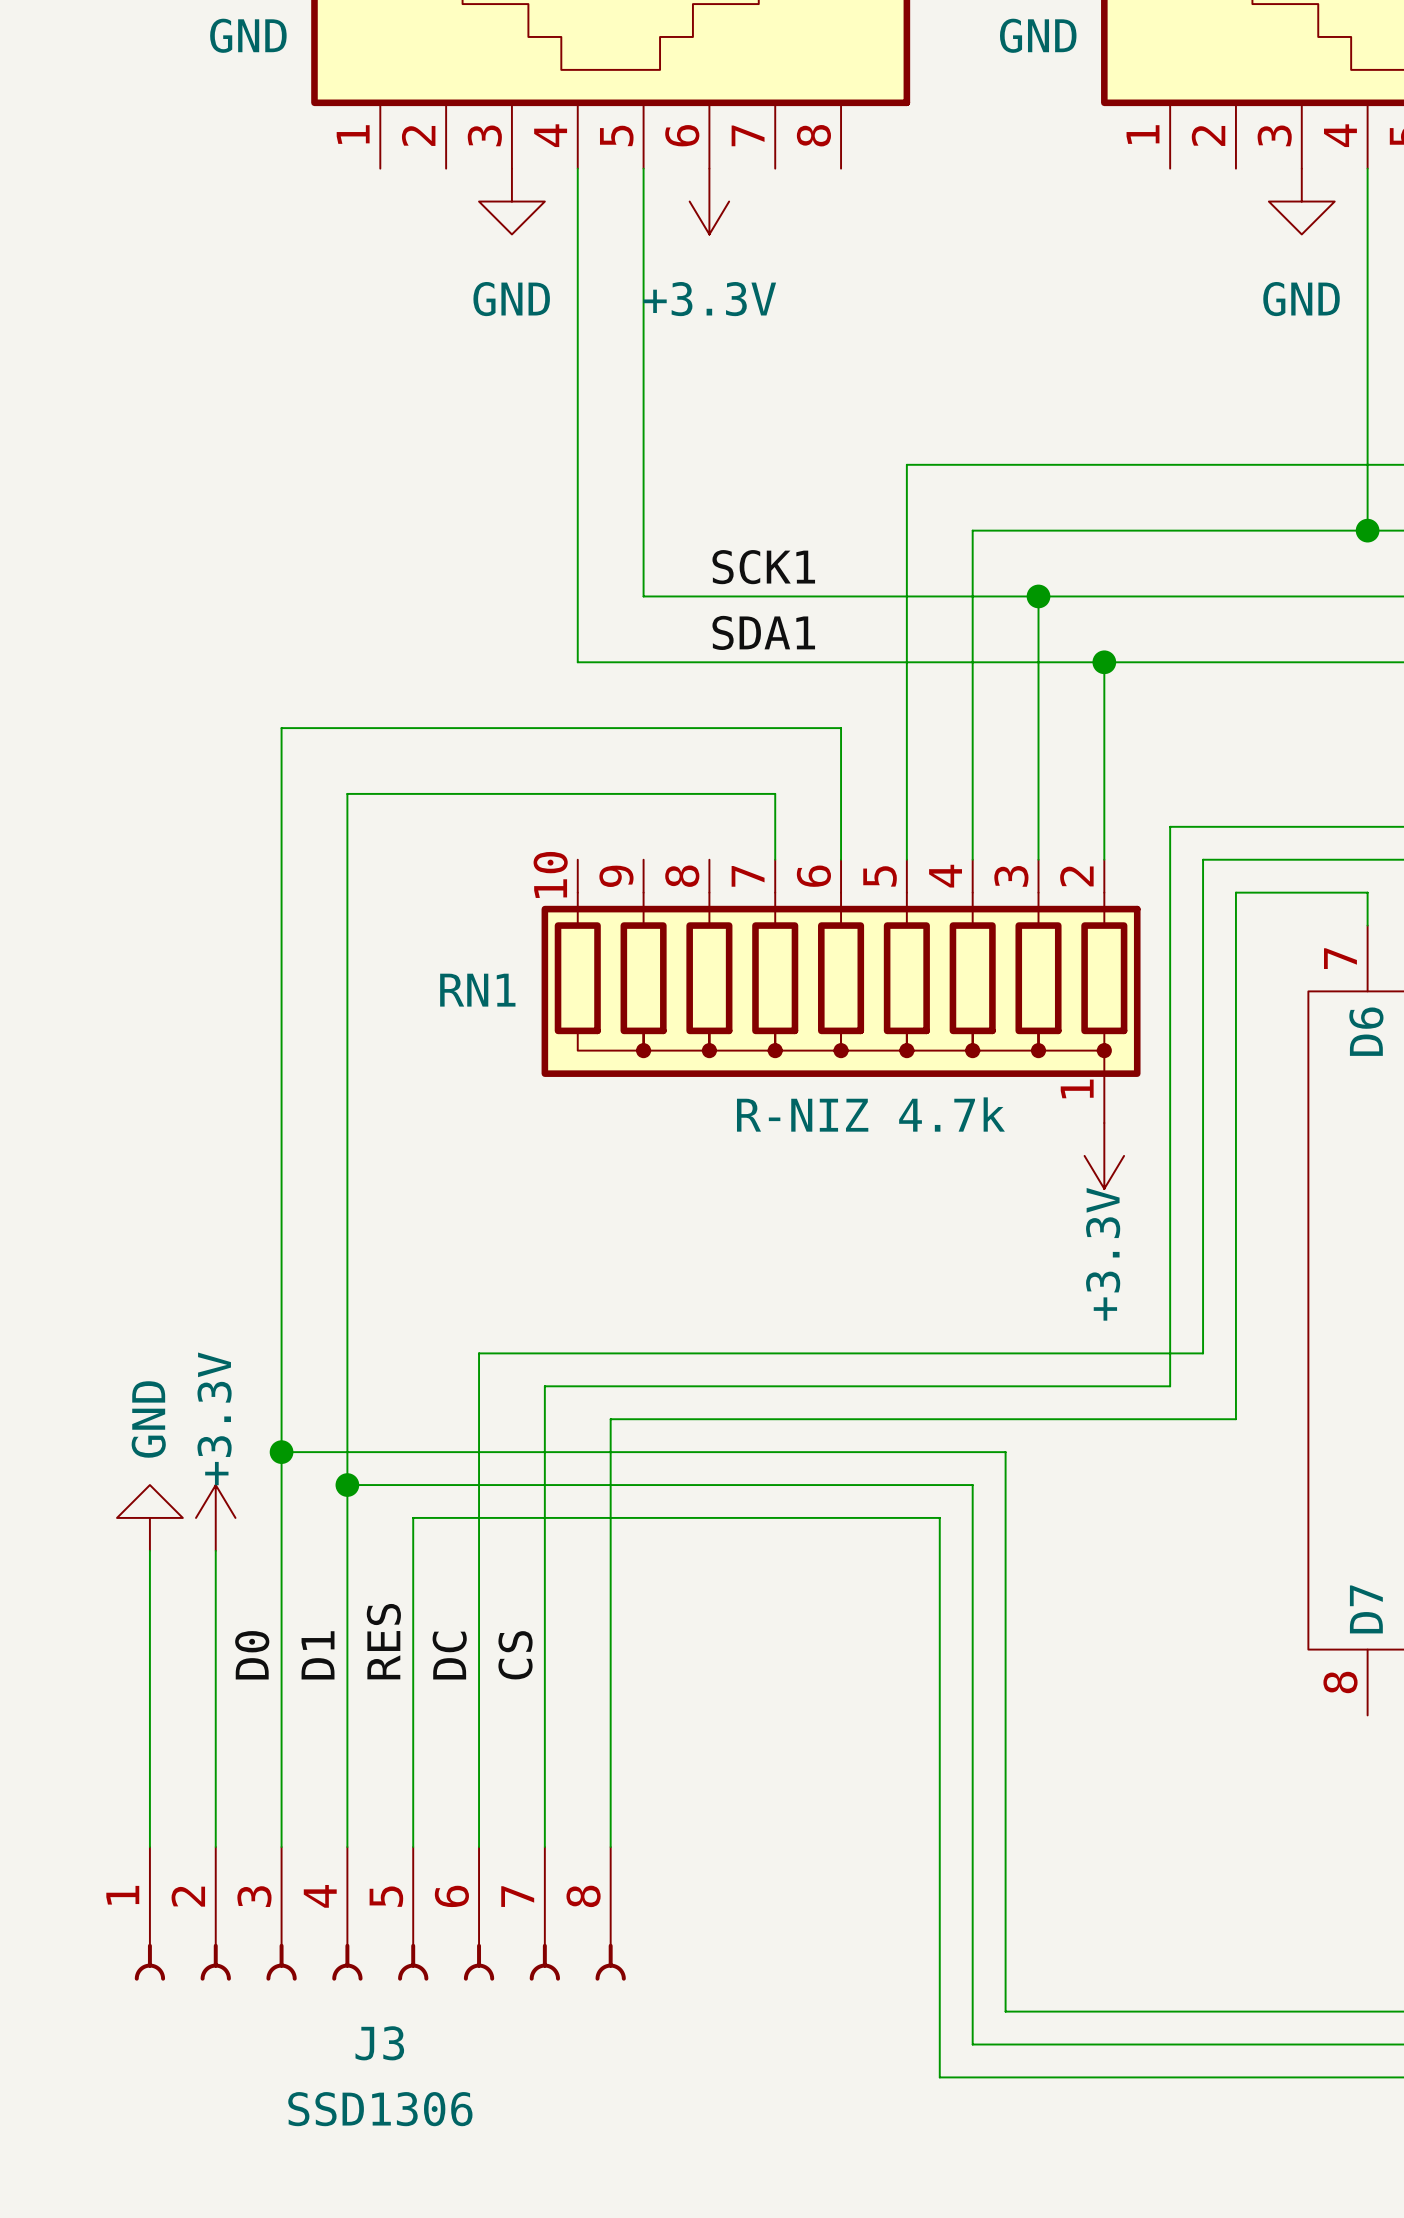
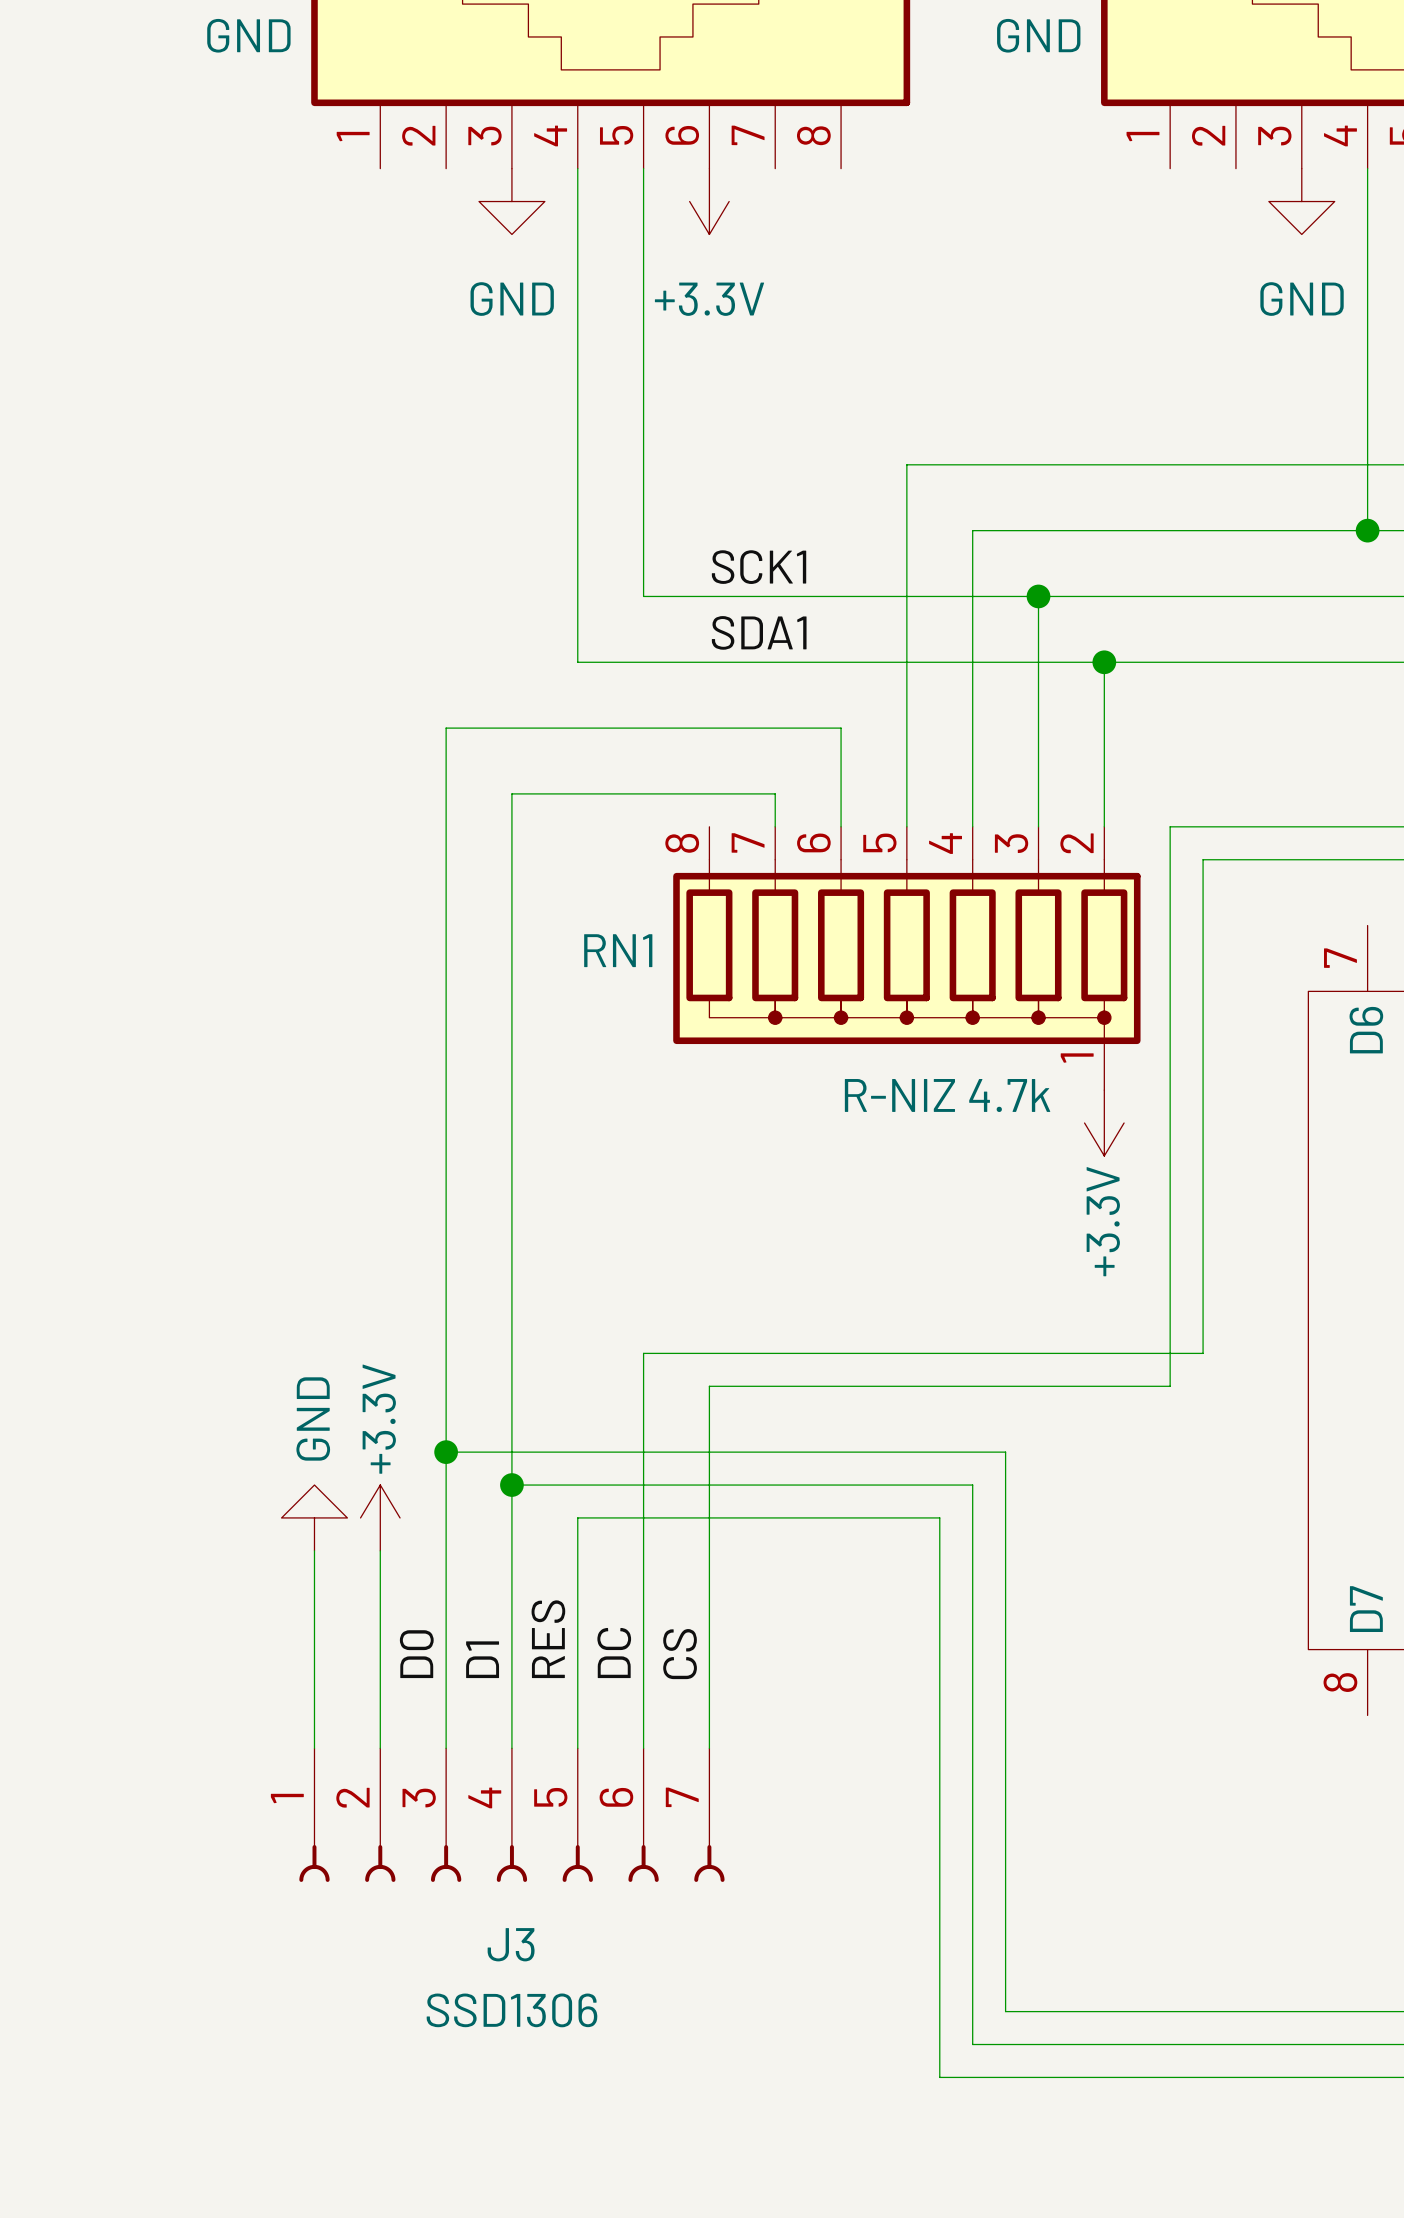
wire: (446, 728) (281, 728) (281, 1847) -> (446, 728) (446, 1748)
wire: (511, 793) (347, 793) (347, 1847) -> (511, 793) (511, 1748)
RN1 symbol: [541, 859, 1141, 1124] -> [673, 826, 1141, 1091]
wire: (1367, 925) (1367, 892) (1235, 892) (1235, 1419) (610, 1419) (610, 1847) -> none
RN1 name position: RN1 (477, 990) -> RN1 (618, 950)
power symbol position: +3.3V (1104, 1155) -> +3.3V (1104, 1123)
wire: (643, 1353) (479, 1353) (479, 1847) -> (643, 1353) (643, 1748)
wire: (709, 1386) (544, 1386) (544, 1847) -> (709, 1386) (709, 1748)
wire: (281, 1452) (446, 1452) -> none
junction: (281, 1452) -> none
junction: none -> (446, 1452)
wire: (347, 1485) (511, 1485) -> none
junction: (347, 1485) -> none
junction: none -> (511, 1485)
power symbol position: GND (149, 1517) -> GND (314, 1517)
power symbol position: +3.3V (215, 1517) -> +3.3V (380, 1517)
wire: (577, 1517) (413, 1517) (413, 1847) -> (577, 1517) (577, 1748)
wire: (149, 1550) (149, 1847) -> none
wire: (215, 1550) (215, 1847) -> none
wire: none -> (314, 1550) (314, 1748)
wire: none -> (380, 1550) (380, 1748)
label position: RES (383, 1641) -> RES (548, 1639)
label position: D0 (252, 1655) -> D0 (416, 1654)
label position: D1 (318, 1655) -> D1 (482, 1659)
label position: DC (449, 1655) -> DC (614, 1653)
label position: CS (515, 1655) -> CS (680, 1654)
J3 symbol: [134, 1847, 626, 1981] -> [299, 1748, 725, 1882]

